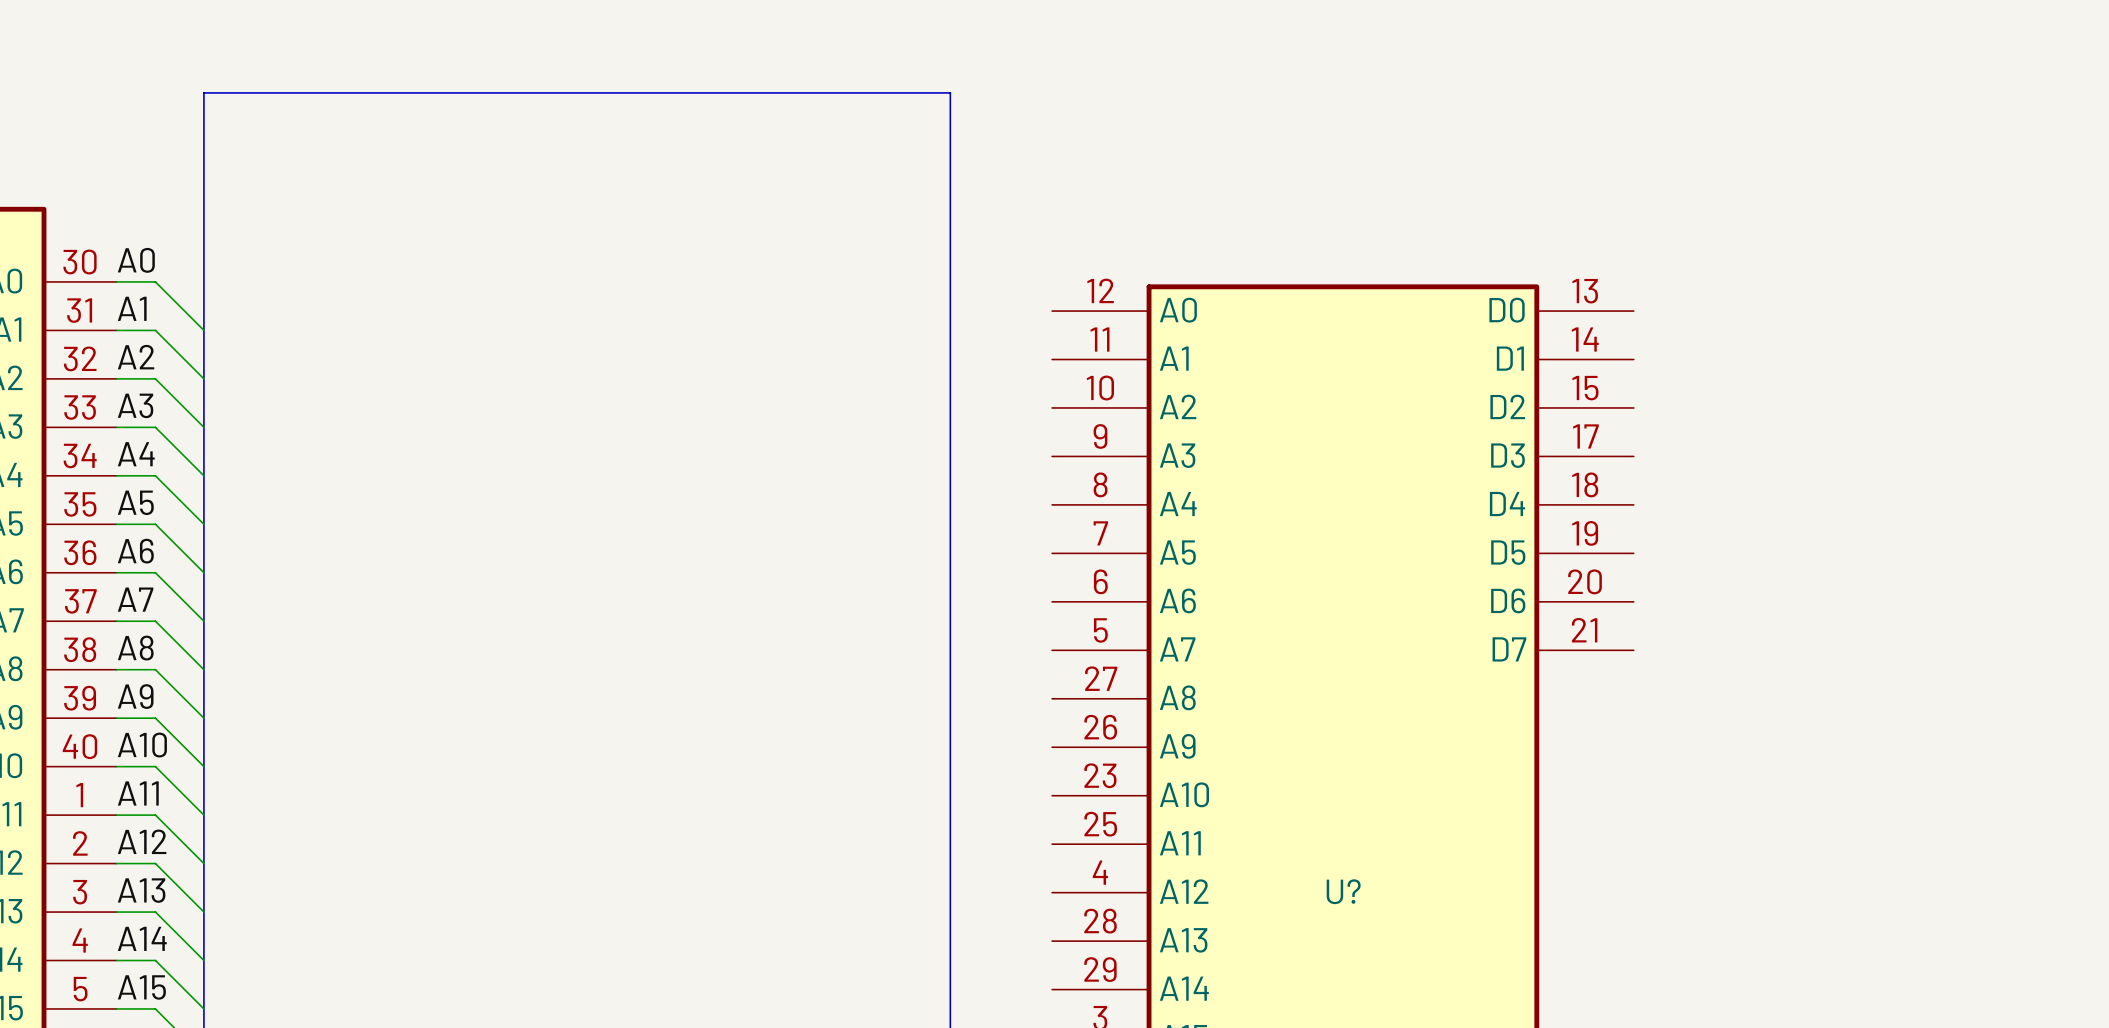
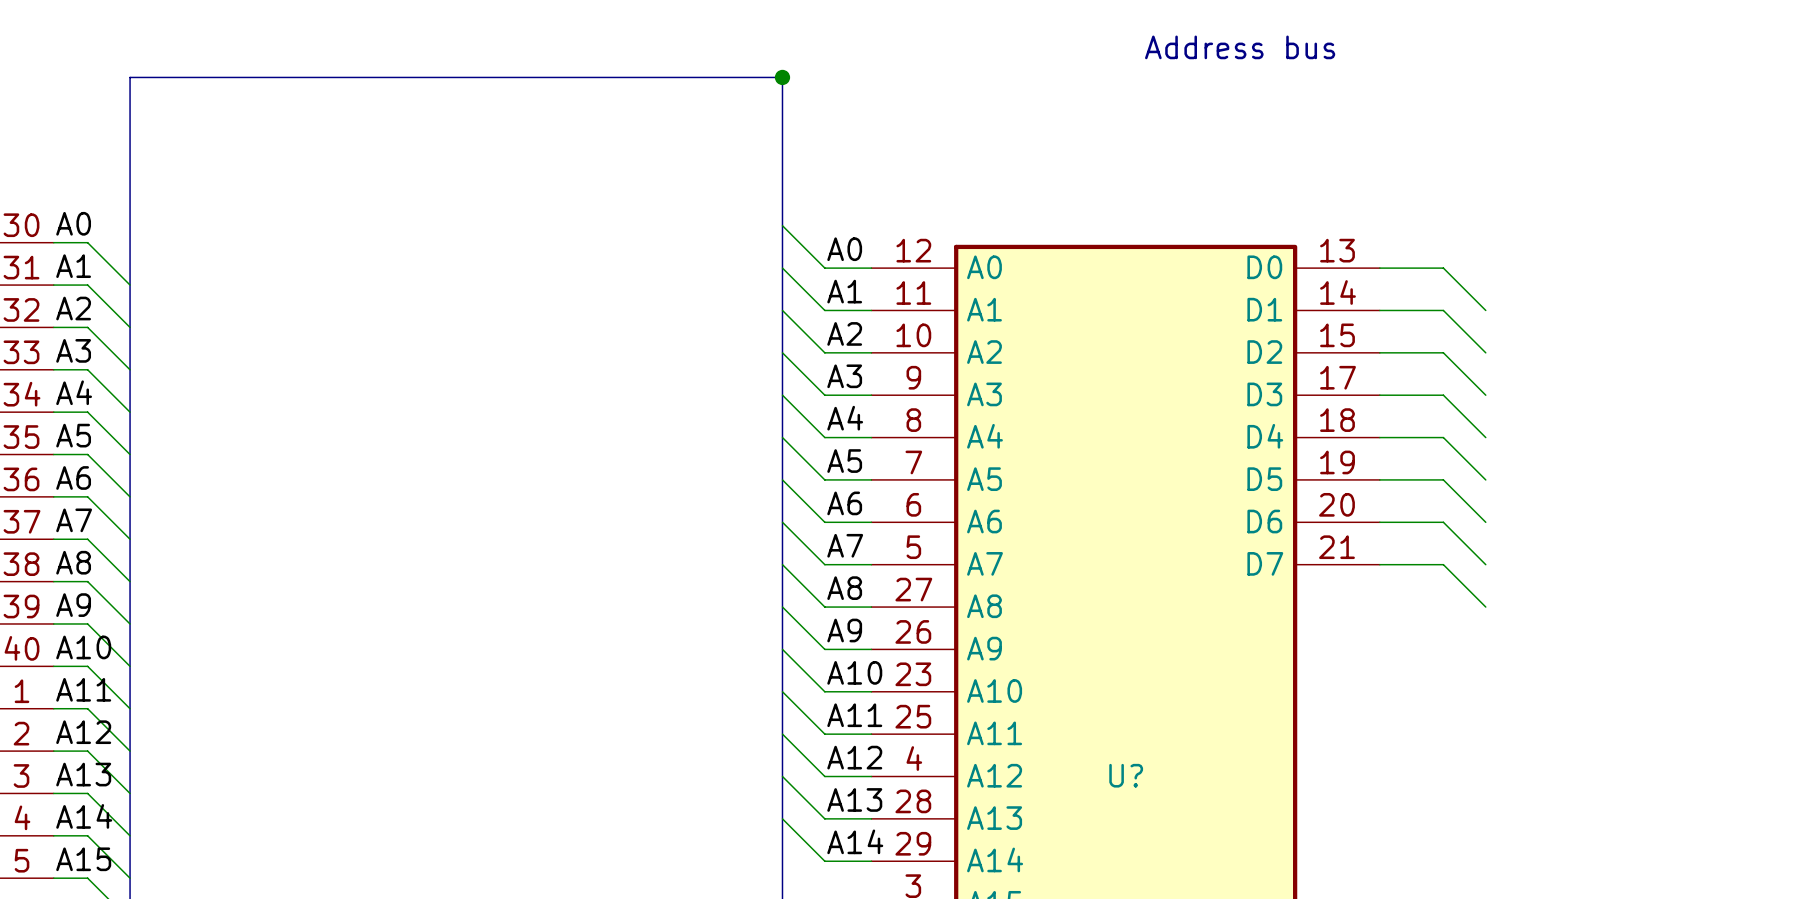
text: none -> Address bus (1240, 47)
junction: none -> (782, 77)
wire: none -> (782, 225) (824, 268) (871, 268)
label: none -> A0 (844, 249)
wire: none -> (782, 268) (824, 310) (871, 310)
wire: none -> (1379, 268) (1443, 268) (1485, 310)
label: none -> A1 (844, 291)
wire: none -> (782, 310) (824, 352) (871, 352)
wire: none -> (1379, 310) (1443, 310) (1485, 352)
label: none -> A2 (844, 333)
wire: none -> (782, 352) (824, 395) (871, 395)
wire: none -> (1379, 352) (1443, 352) (1485, 395)
label: none -> A3 (844, 376)
wire: none -> (782, 395) (824, 437) (871, 437)
wire: none -> (1379, 395) (1443, 395) (1485, 437)
label: none -> A4 (845, 418)
wire: none -> (782, 437) (824, 479) (871, 479)
wire: none -> (1379, 437) (1443, 437) (1485, 479)
label: none -> A5 (844, 461)
wire: none -> (782, 479) (824, 522) (871, 522)
wire: none -> (1379, 479) (1443, 479) (1485, 522)
label: none -> A6 (844, 503)
wire: none -> (782, 522) (824, 564) (871, 564)
wire: none -> (1379, 522) (1443, 522) (1485, 564)
label: none -> A7 (845, 545)
wire: none -> (782, 564) (824, 607) (871, 607)
wire: none -> (1379, 564) (1443, 564) (1485, 607)
label: none -> A8 (844, 588)
wire: none -> (782, 607) (824, 649) (871, 649)
label: none -> A9 (844, 630)
wire: none -> (782, 649) (824, 691) (871, 691)
label: none -> A10 (854, 672)
wire: none -> (782, 691) (824, 734) (871, 734)
label: none -> A11 (854, 715)
wire: none -> (782, 734) (824, 776) (871, 776)
label: none -> A12 (854, 757)
wire: none -> (782, 776) (824, 818) (871, 818)
label: none -> A13 (854, 799)
wire: none -> (782, 818) (824, 861) (871, 861)
label: none -> A14 (855, 841)

